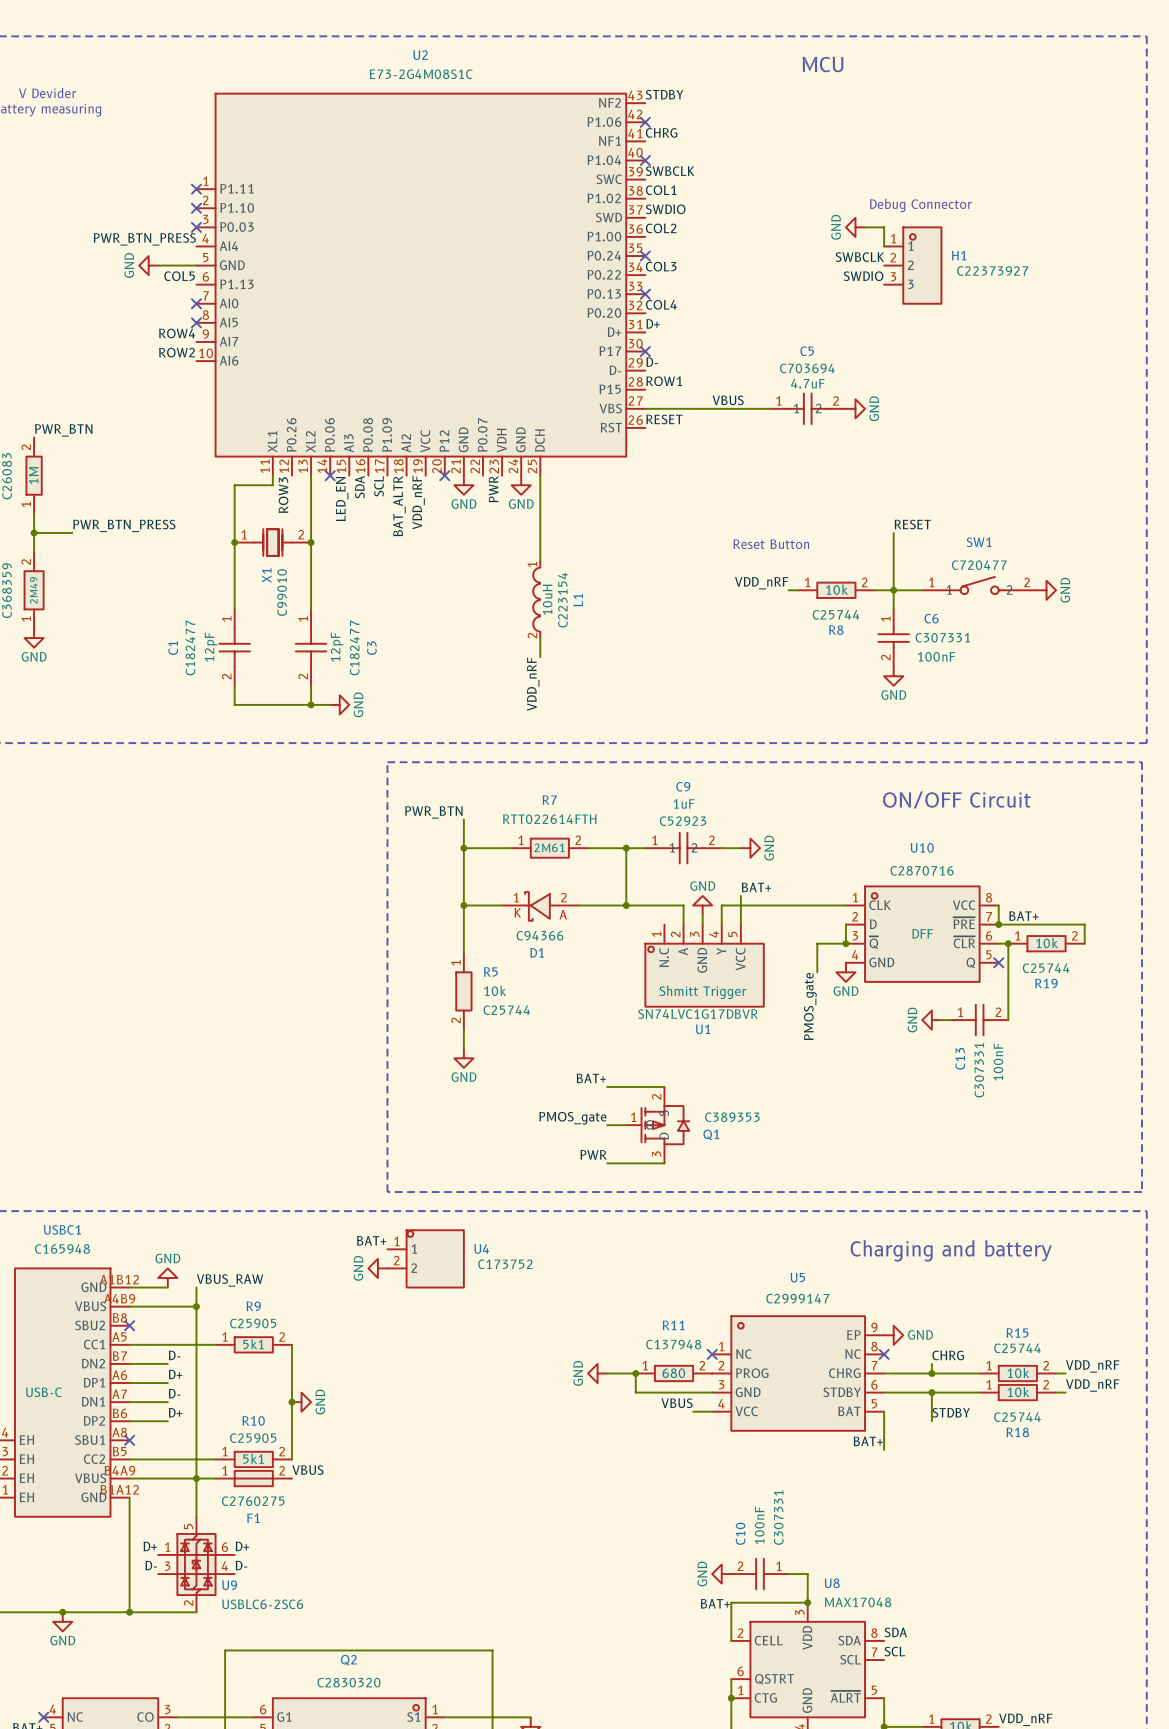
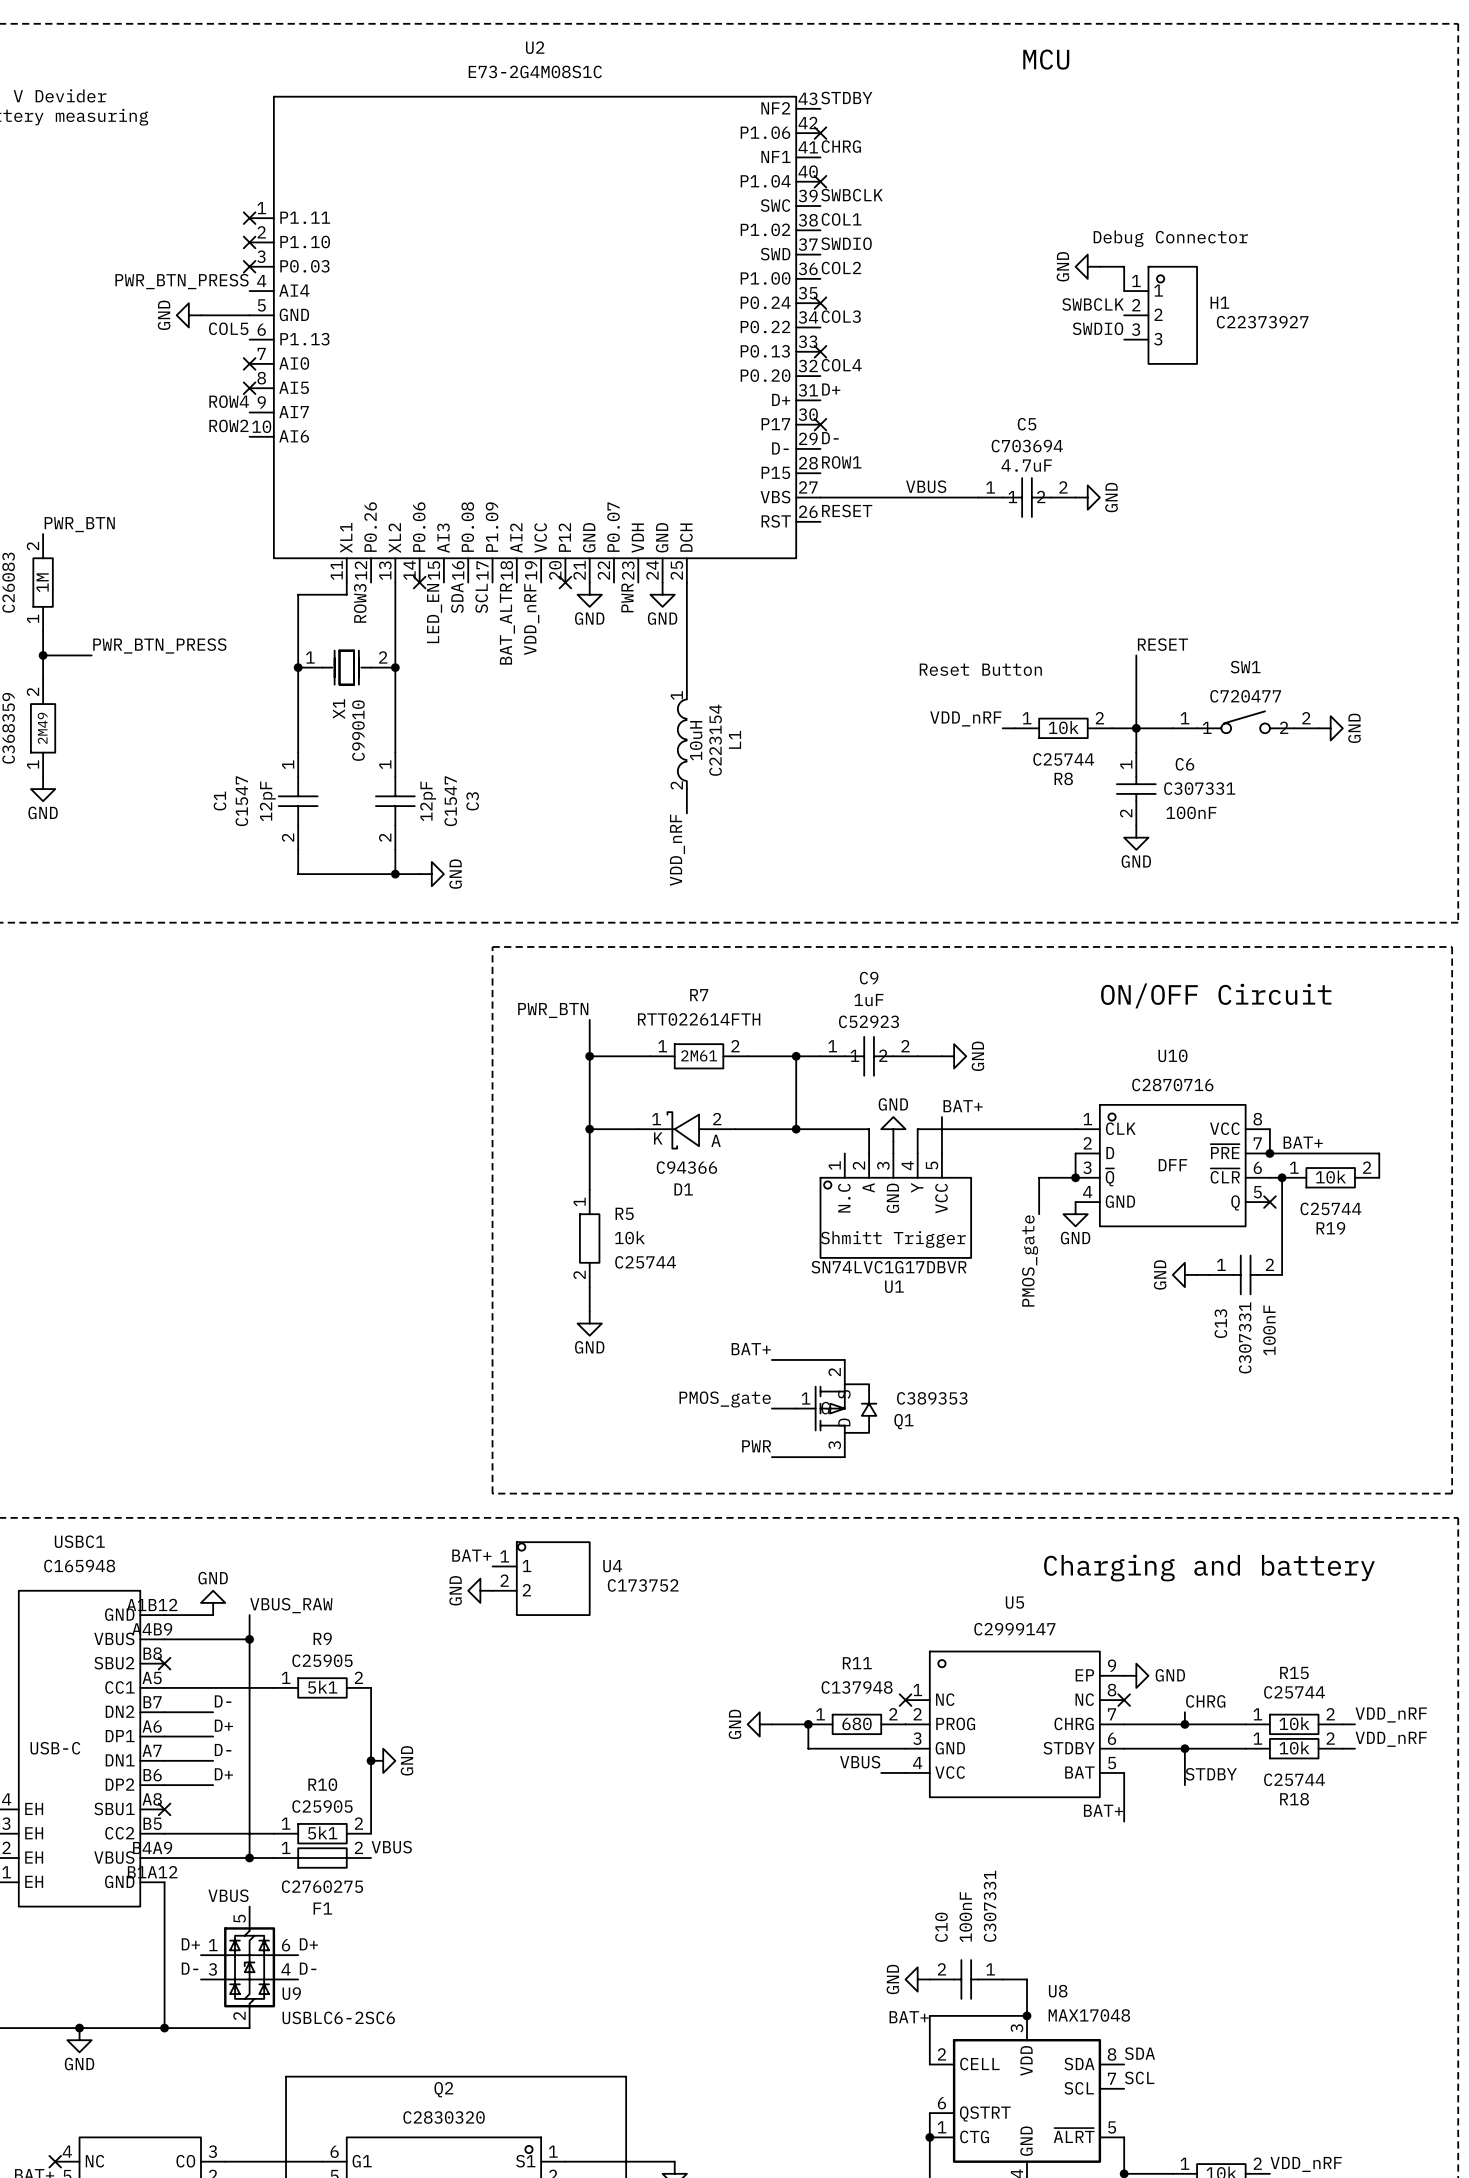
C1 text: C182477 (190, 647) -> C1547 (241, 801)
C3 text: C182477 (354, 647) -> C1547 (450, 801)
wire: (196, 1478) (196, 1516) -> none
label: none -> VBUS (228, 1895)

